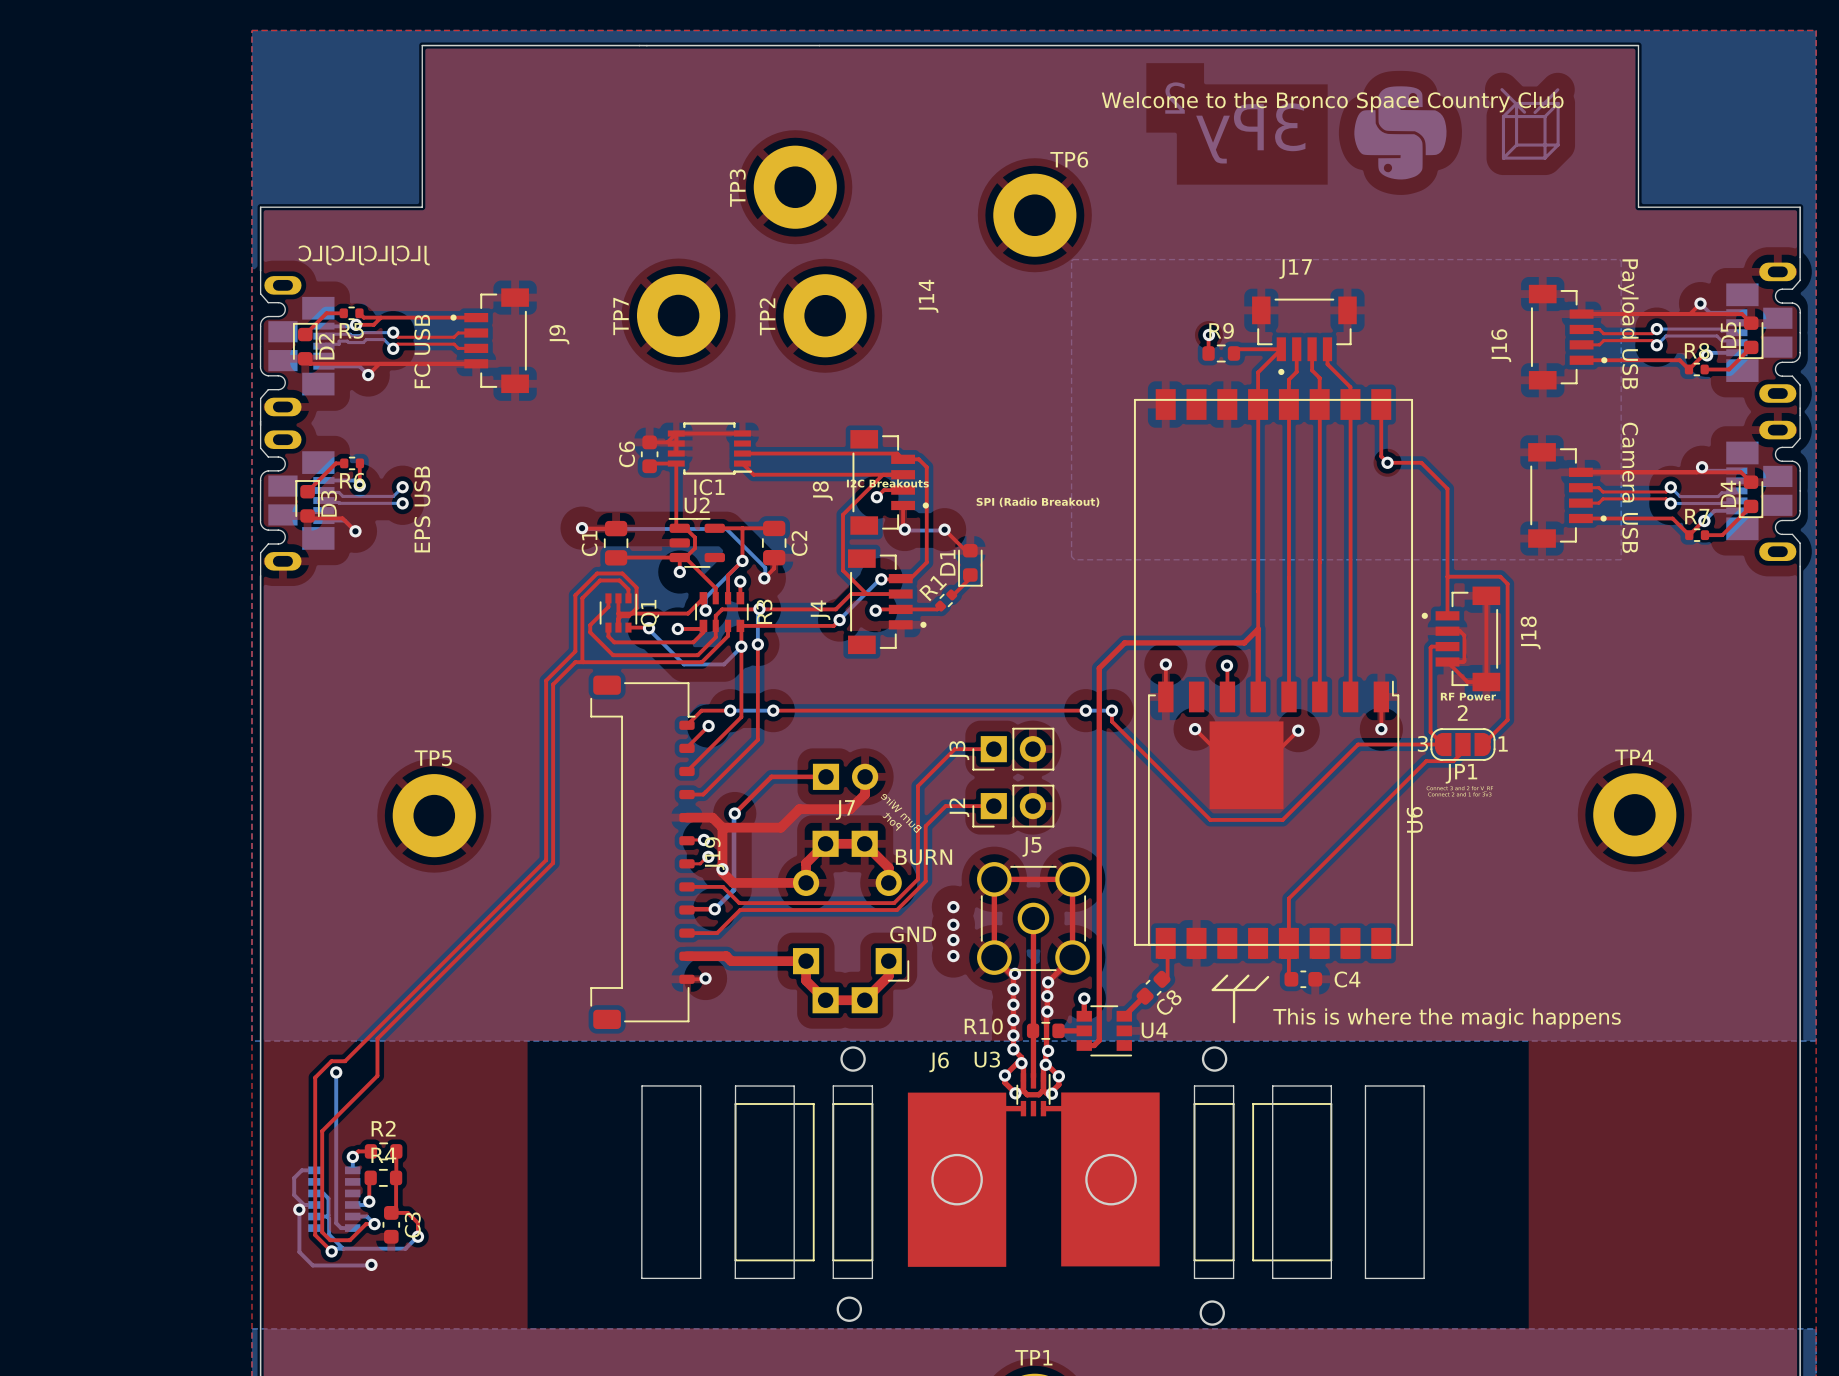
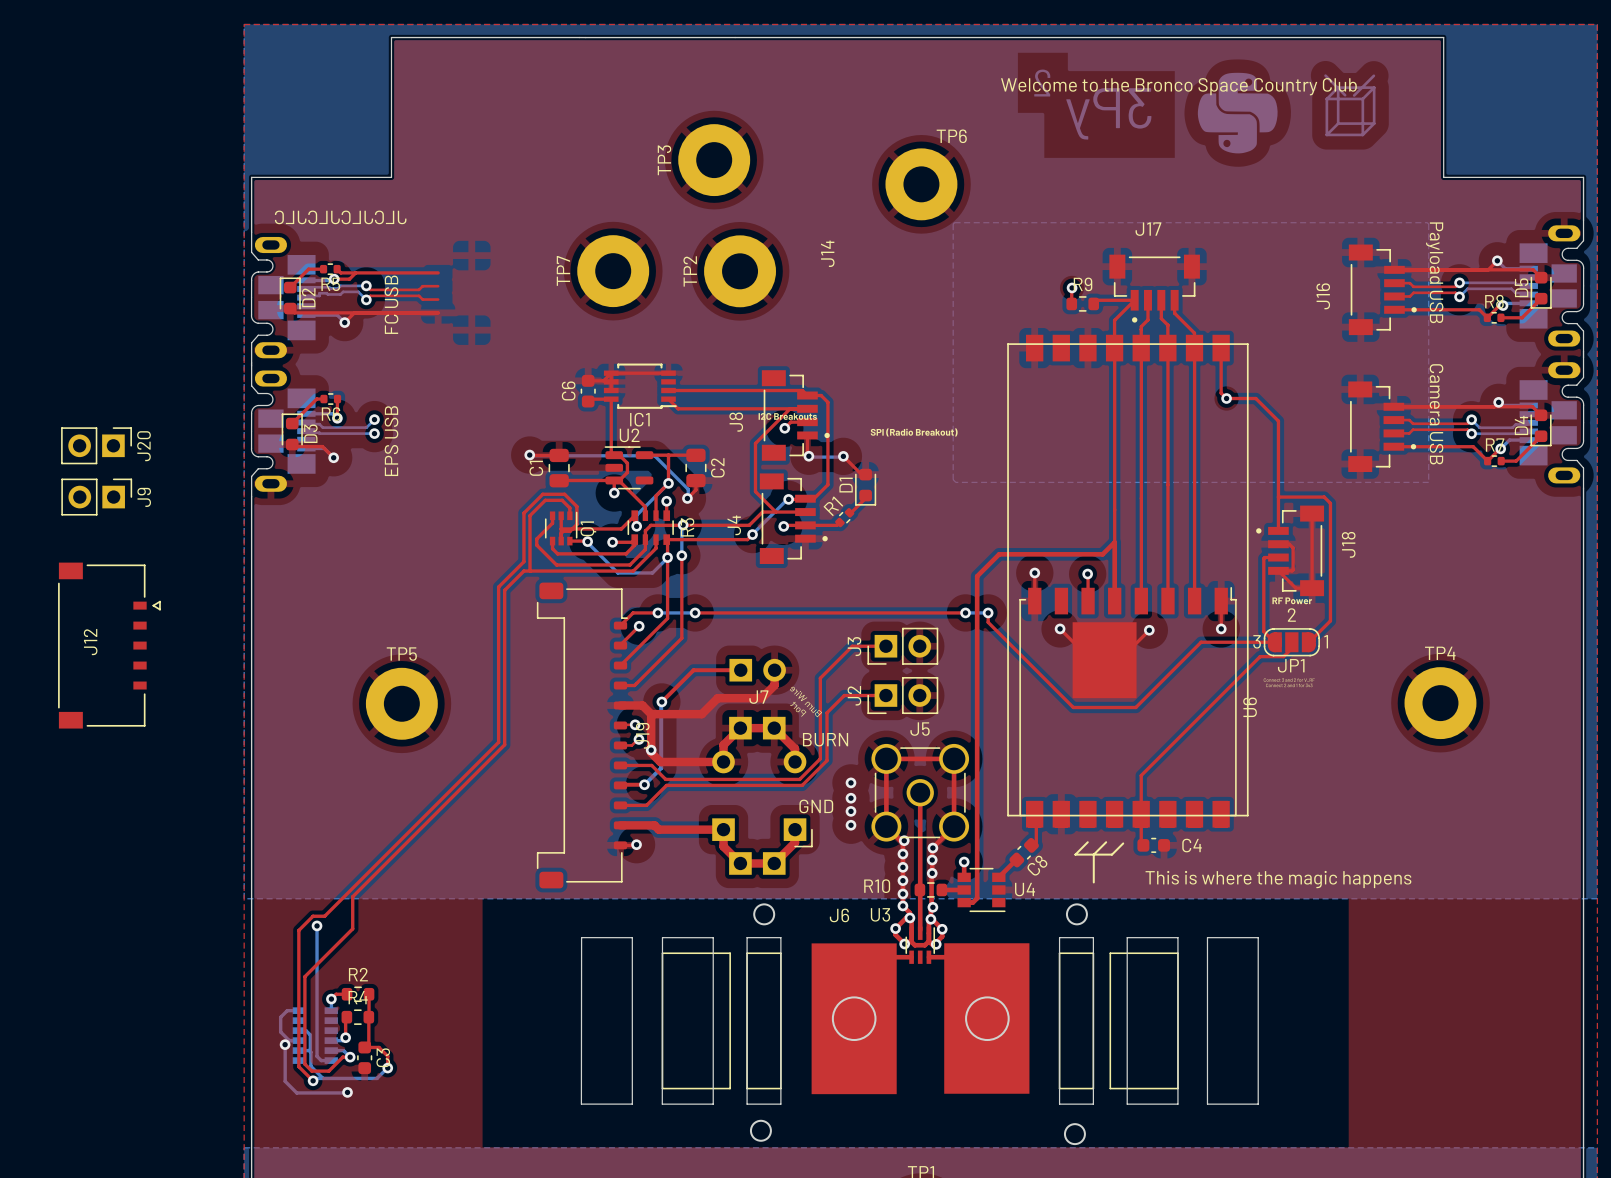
J9 footprint: [450, 288, 529, 394] -> [61, 478, 133, 516]
J20: none -> (96, 445)
J12: none -> (109, 645)

